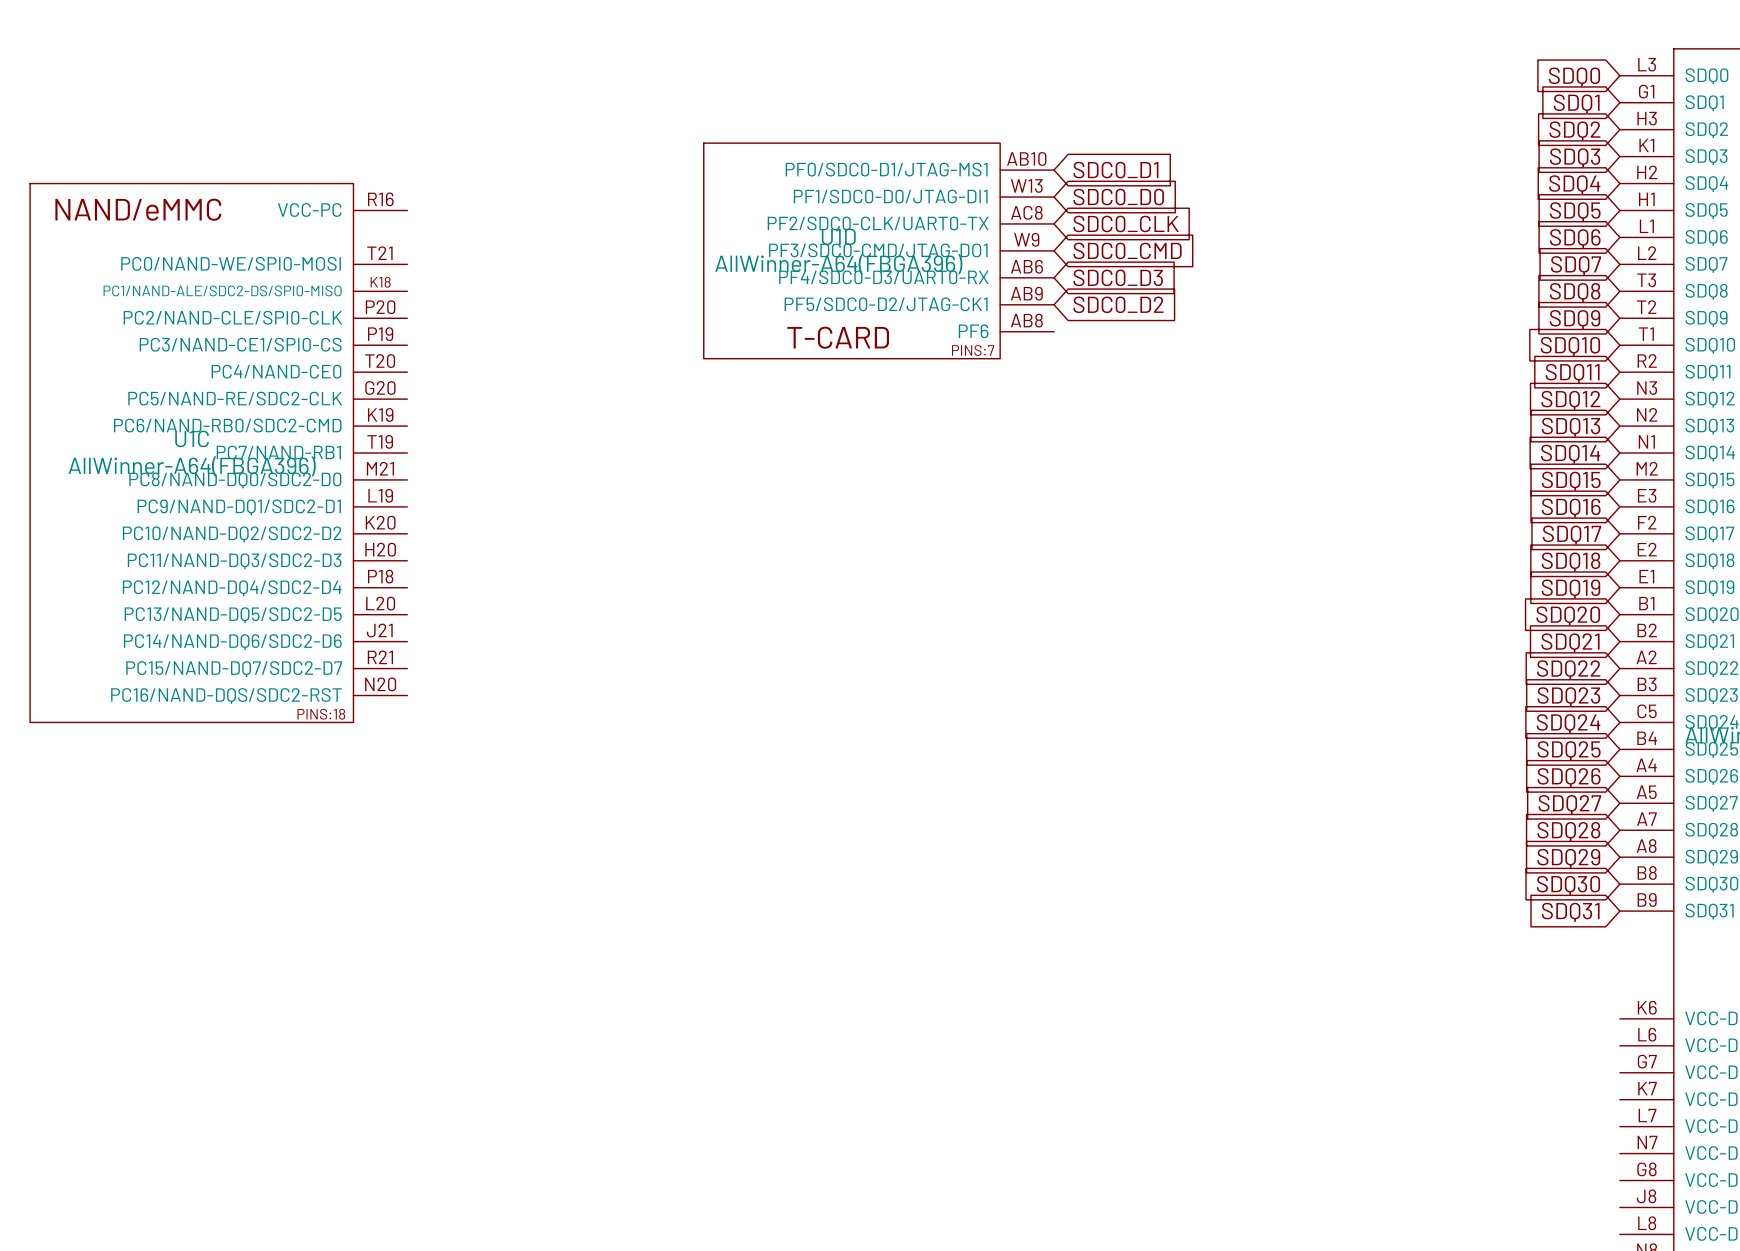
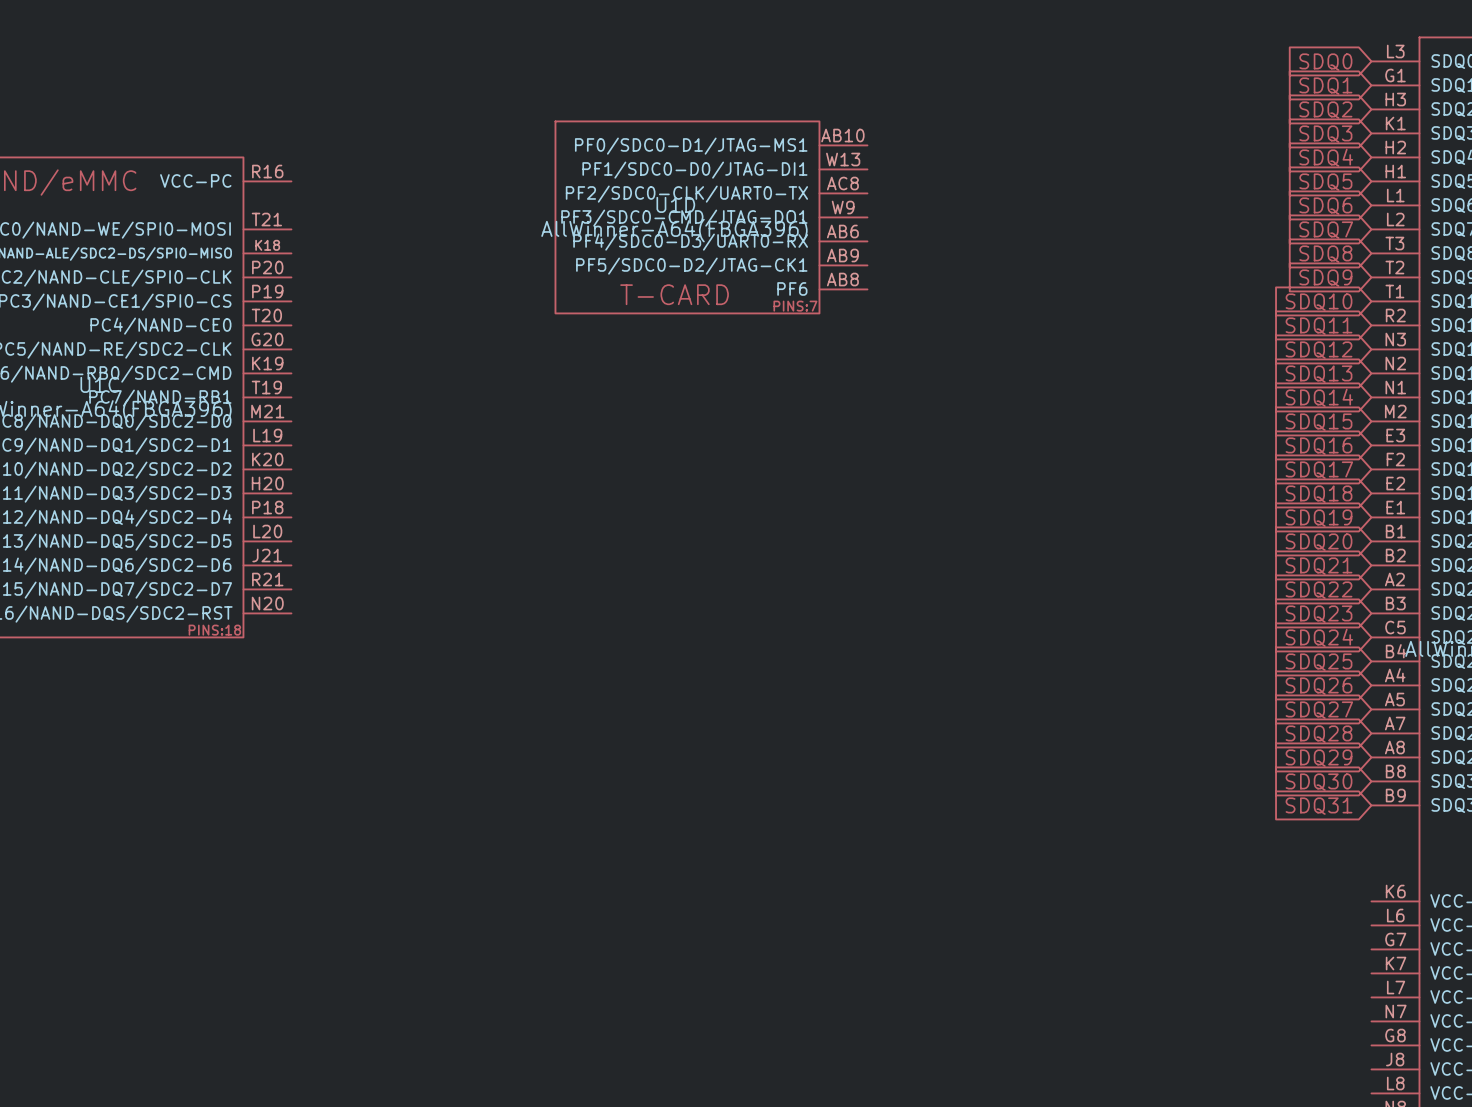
global label: SDC0_D1 (1115, 170) -> none
global label: SDC0_D0 (1118, 197) -> none
global label: SDC0_CLK (1126, 223) -> none
global label: SDC0_CMD (1127, 250) -> none
global label: SDC0_D3 (1118, 277) -> none
global label: SDC0_D2 (1118, 304) -> none

